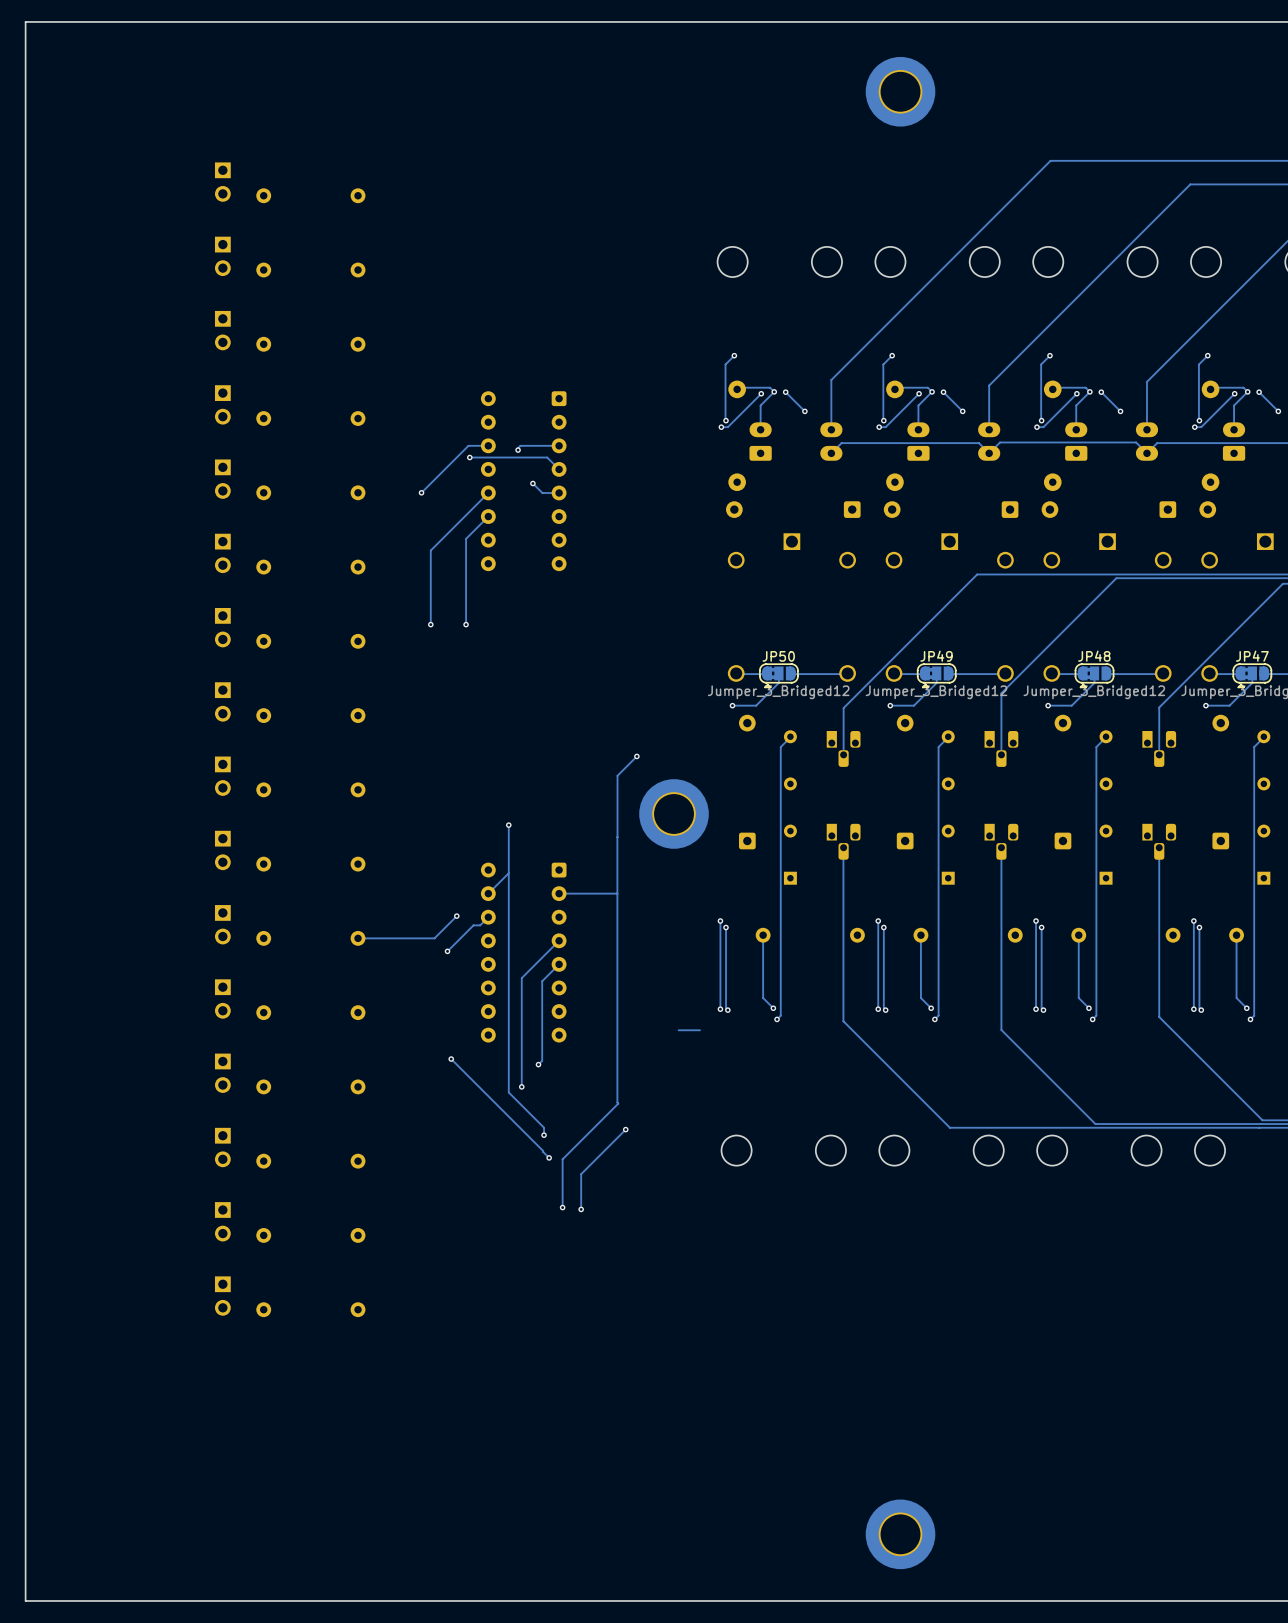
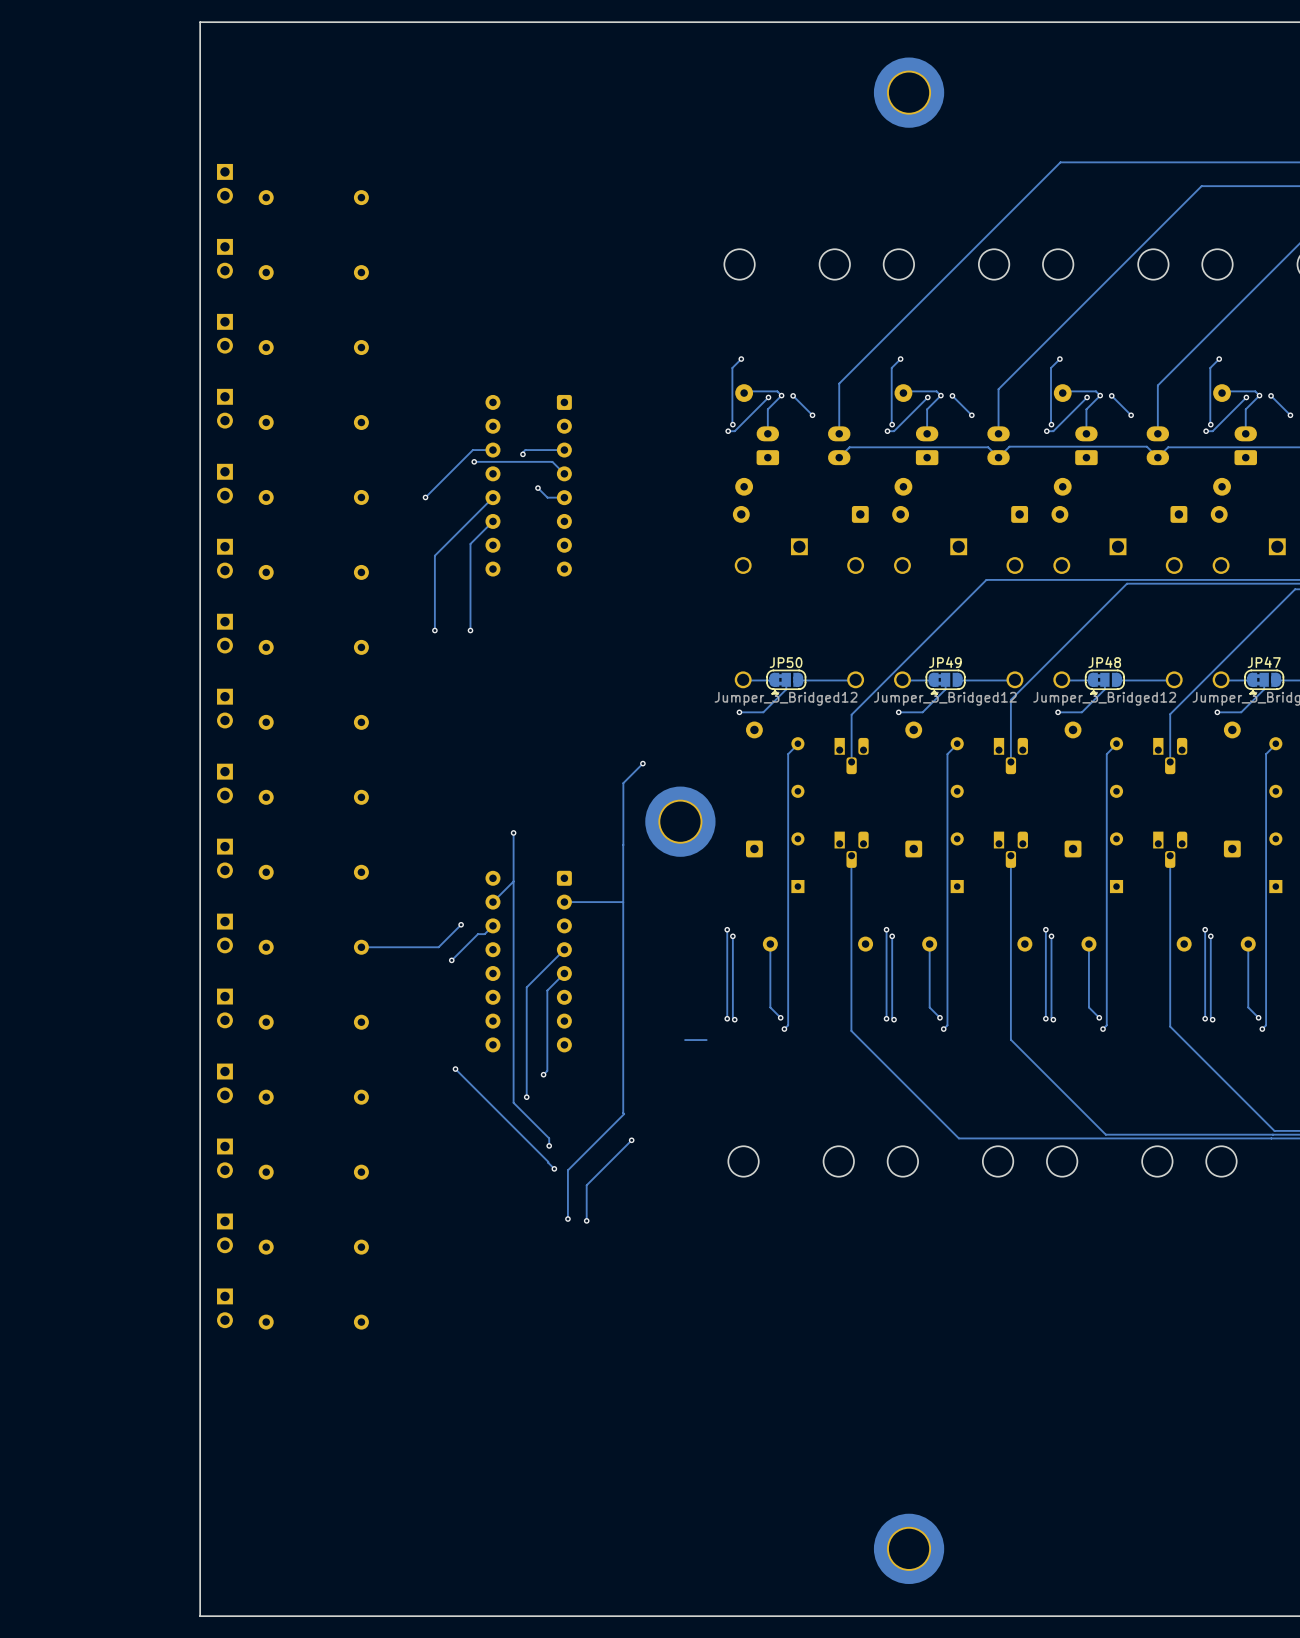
board edge: (198, 21) (25, 21) (25, 1600) (198, 1600) -> (200, 22) (200, 1616)

